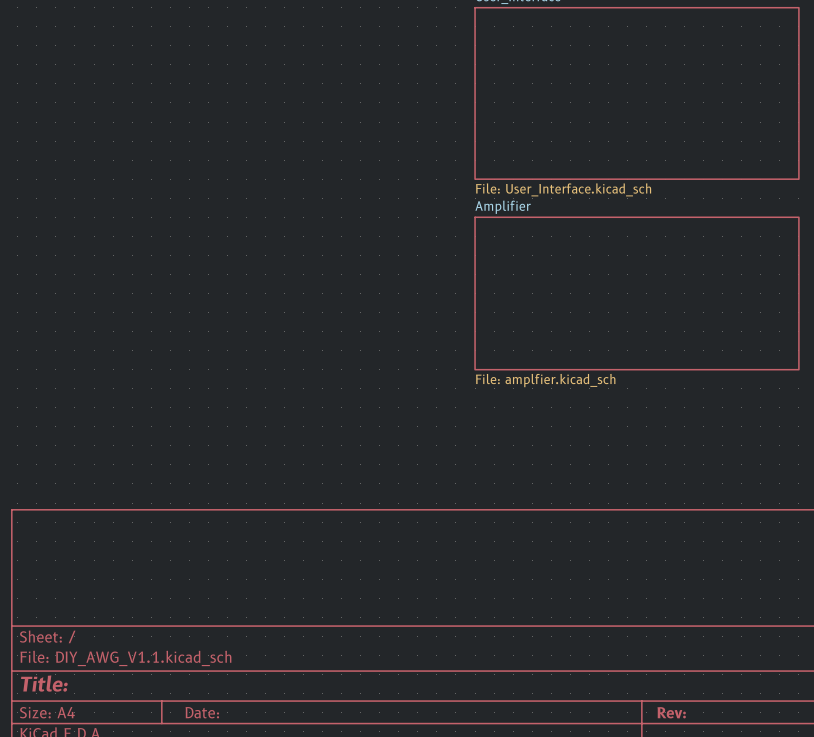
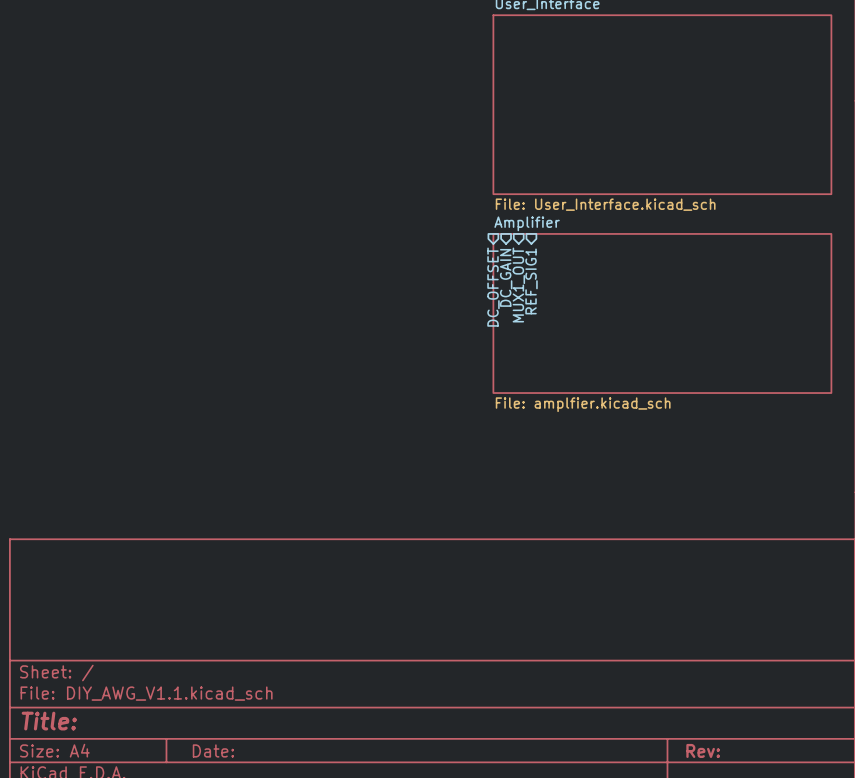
sheet pin: none -> DC_GAIN (506, 277)
sheet pin: none -> REF_SIG1 (531, 281)
sheet pin: none -> DC_OFFSET (493, 287)
sheet pin: none -> MUX1_OUT (518, 285)

